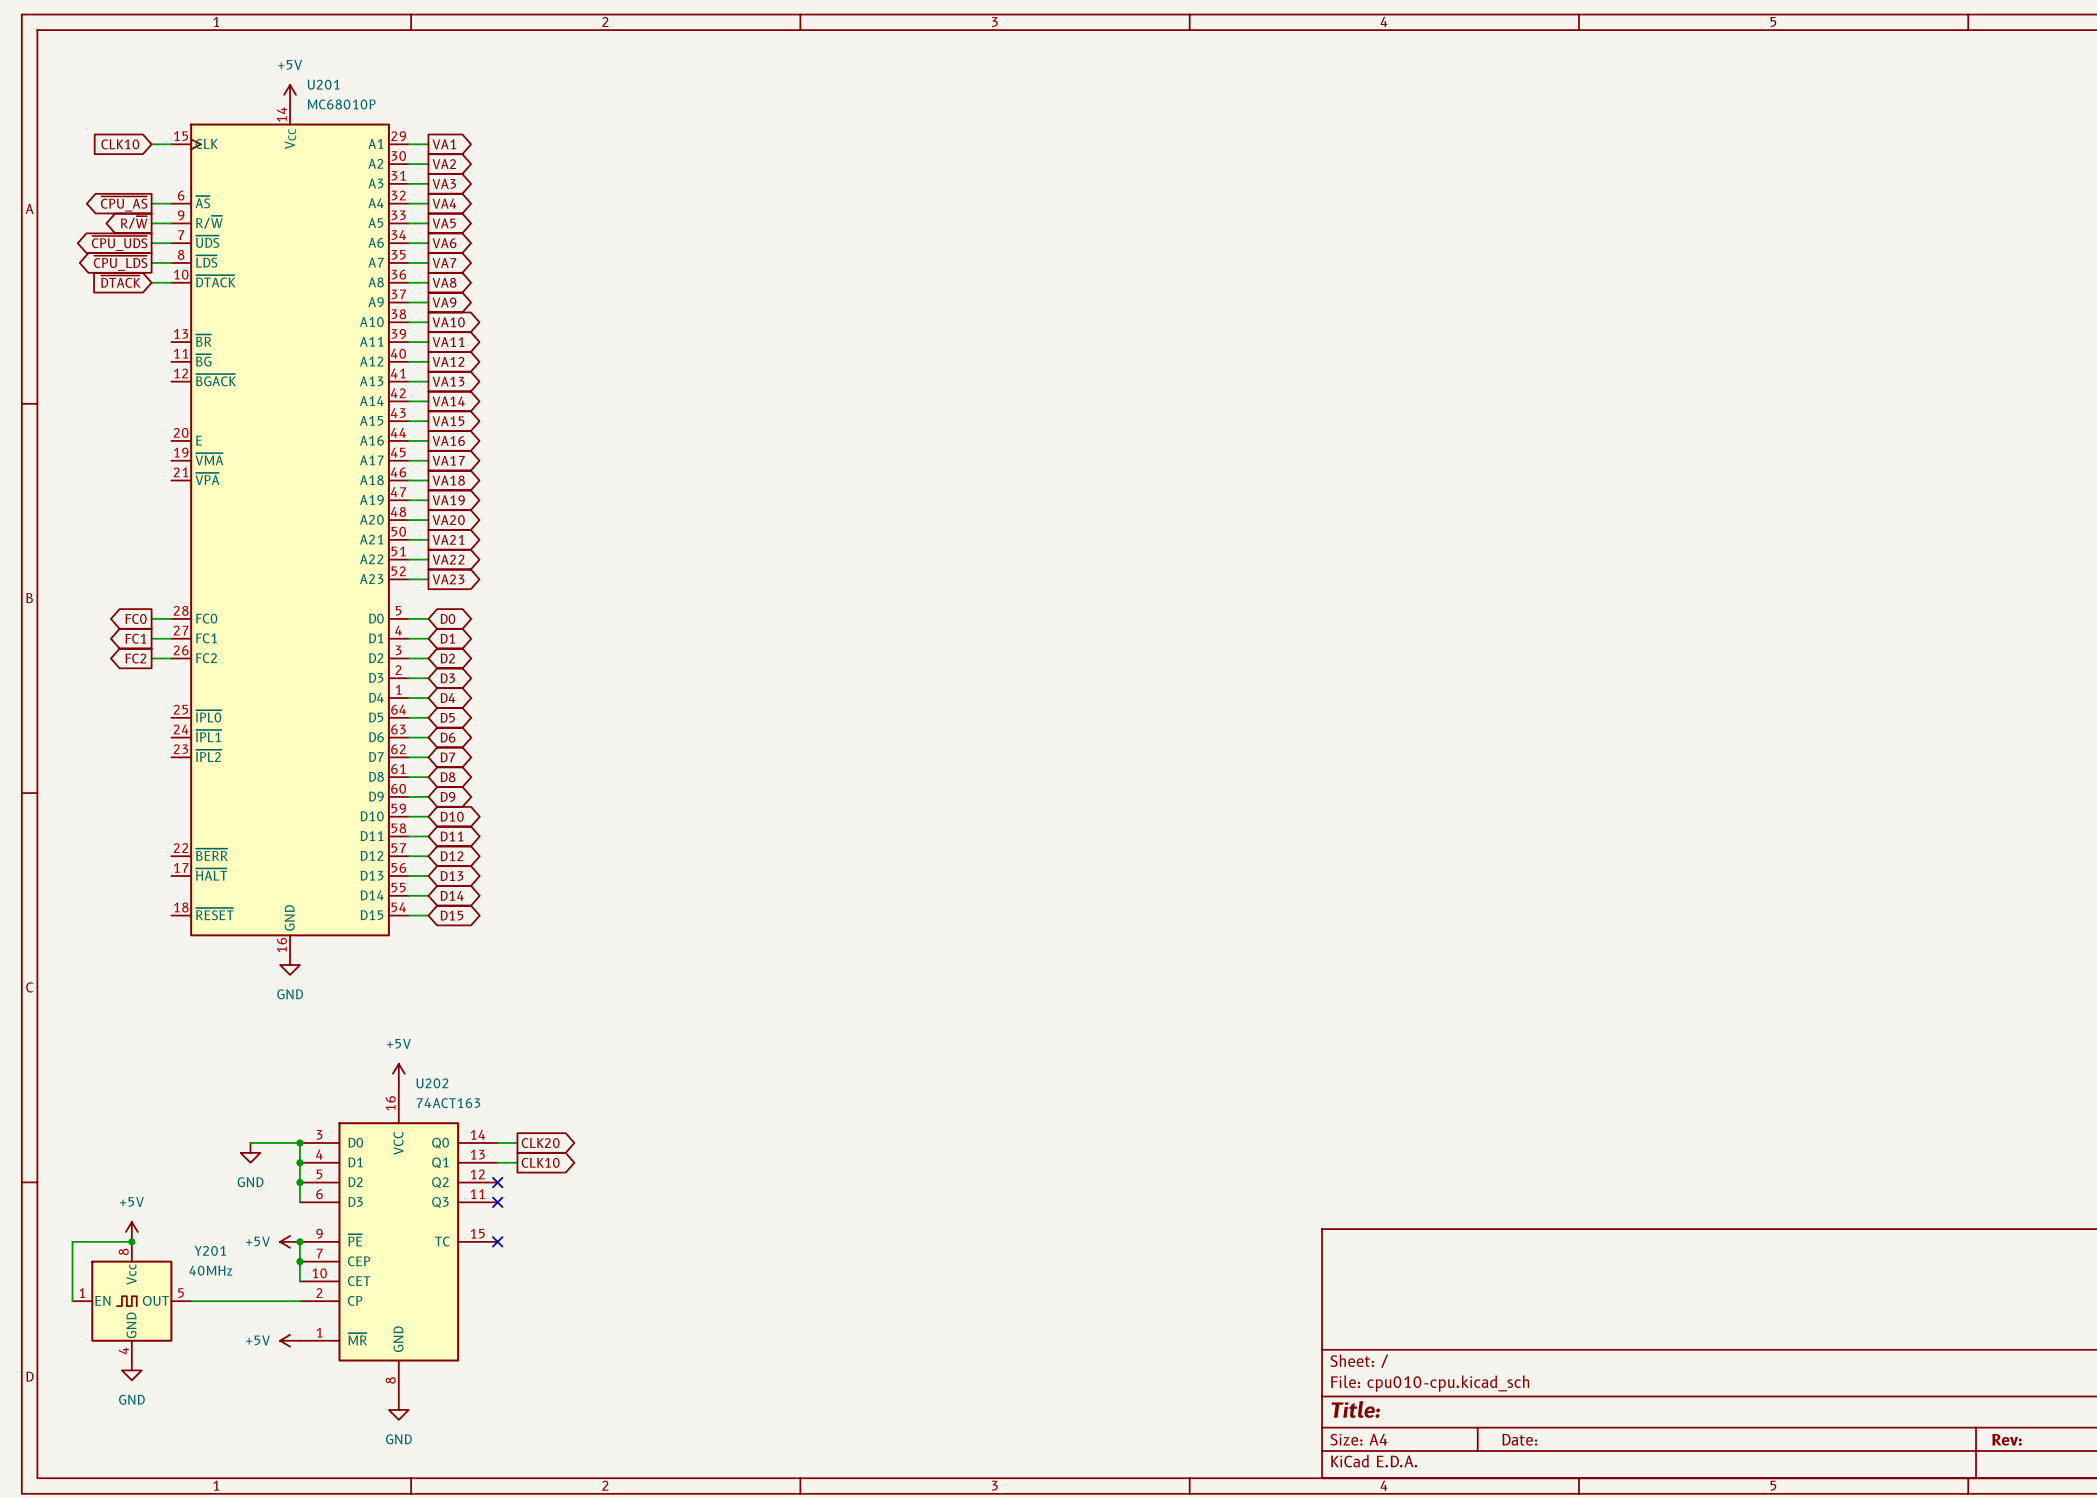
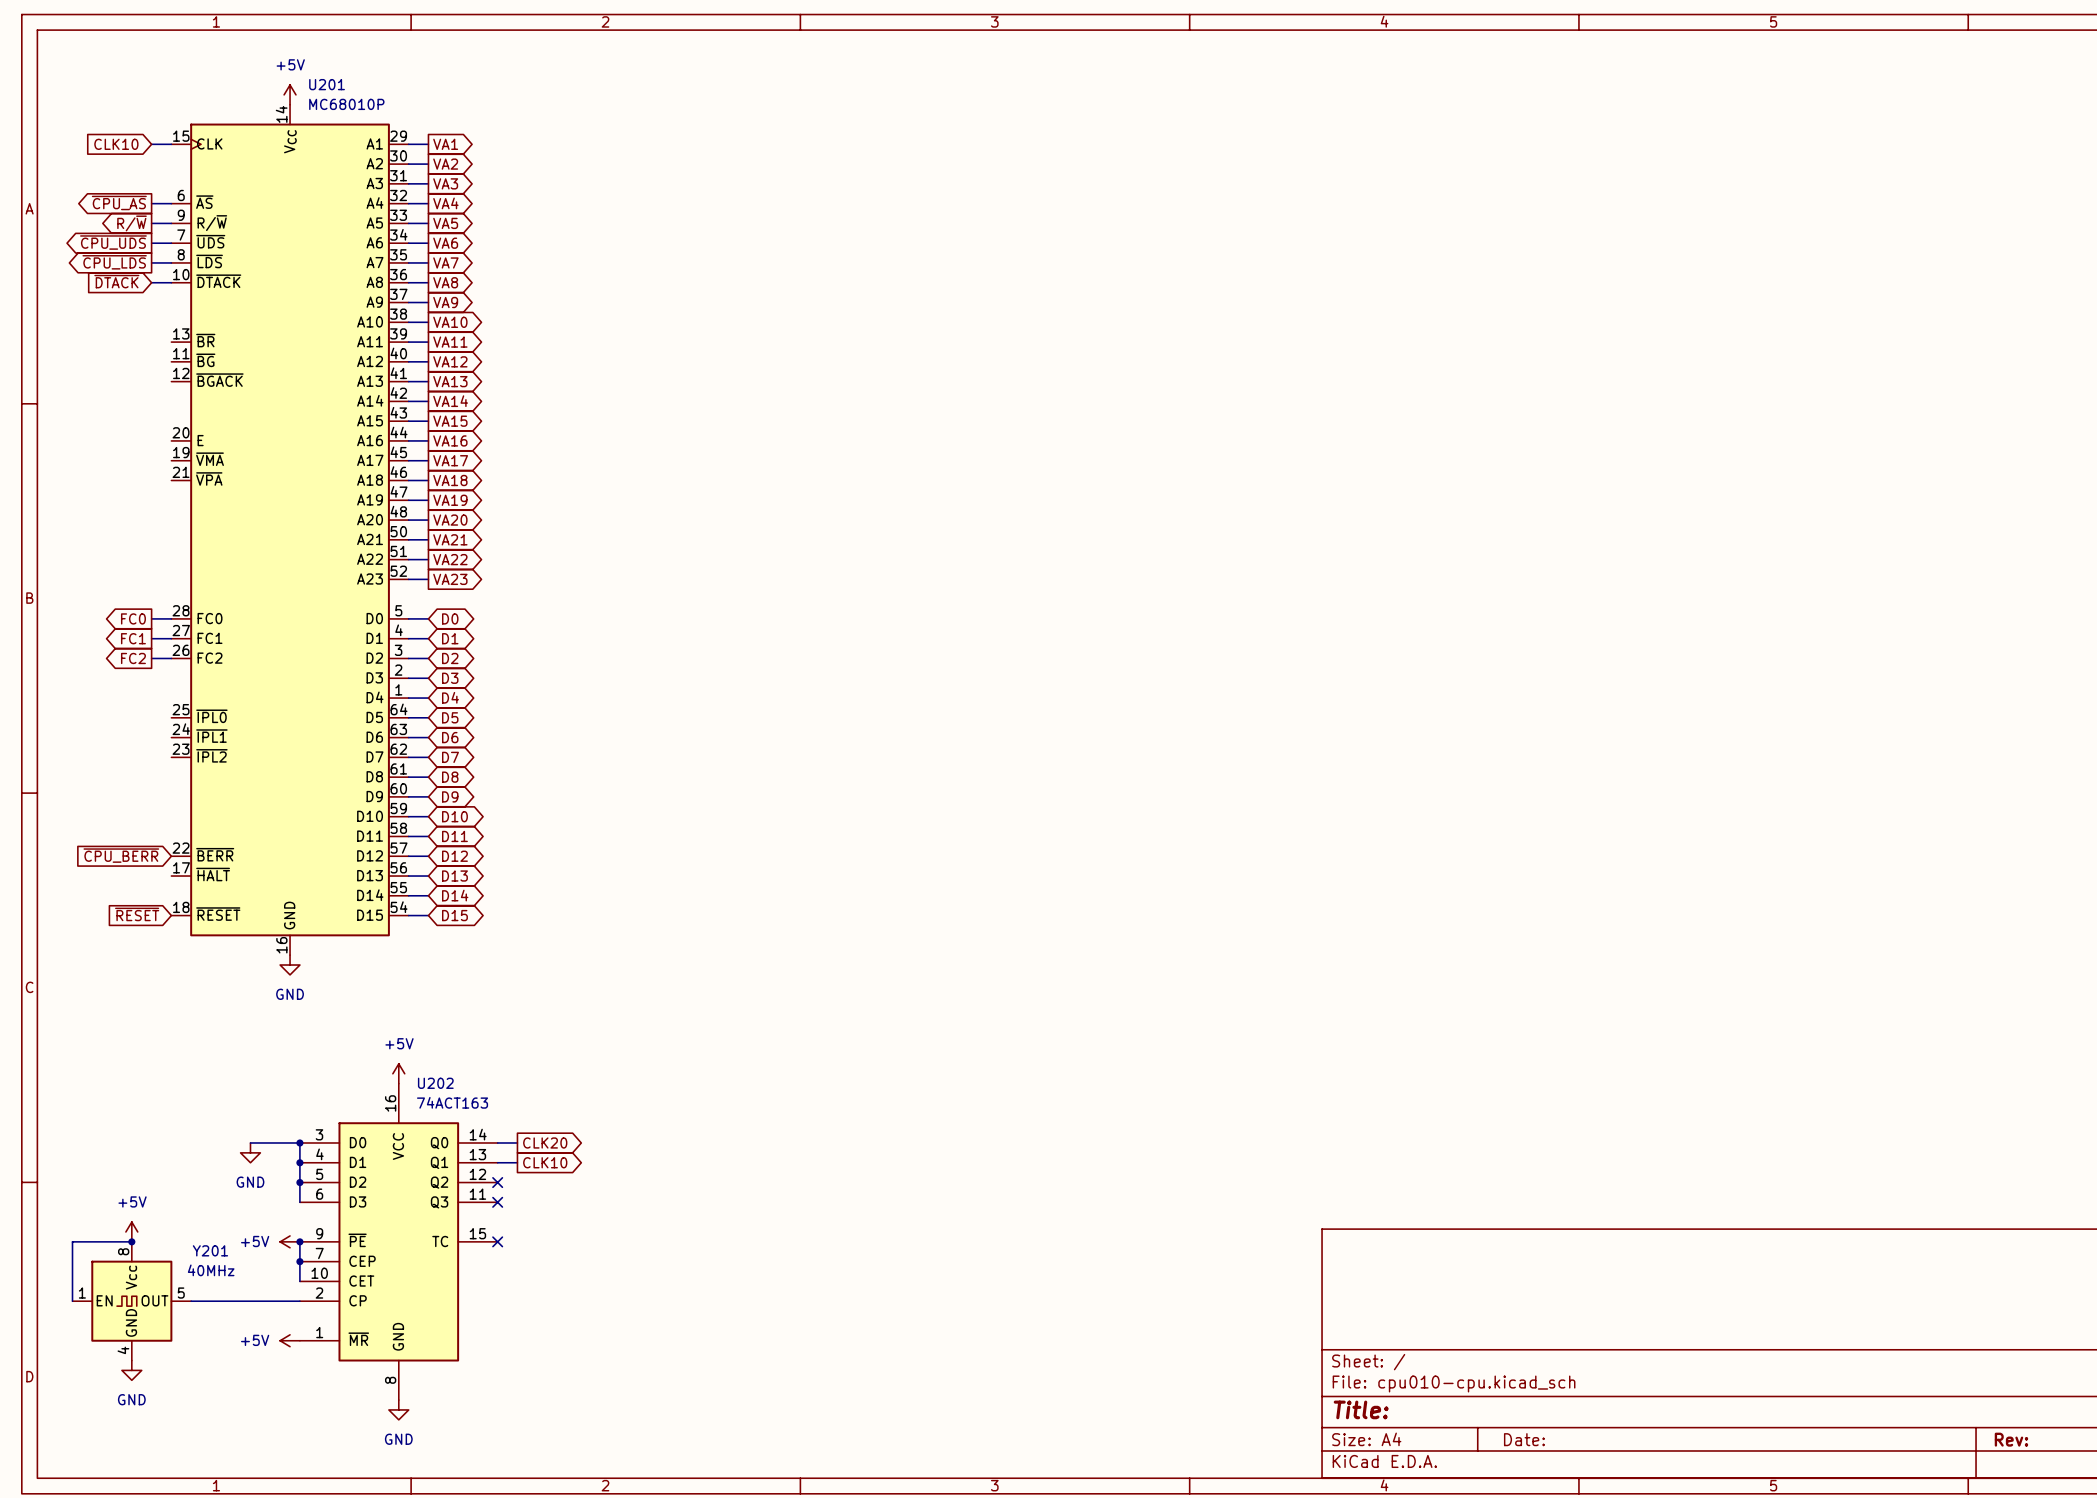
global label: none -> ~{CPU_BERR} (121, 855)
global label: none -> ~{RESET} (137, 914)

